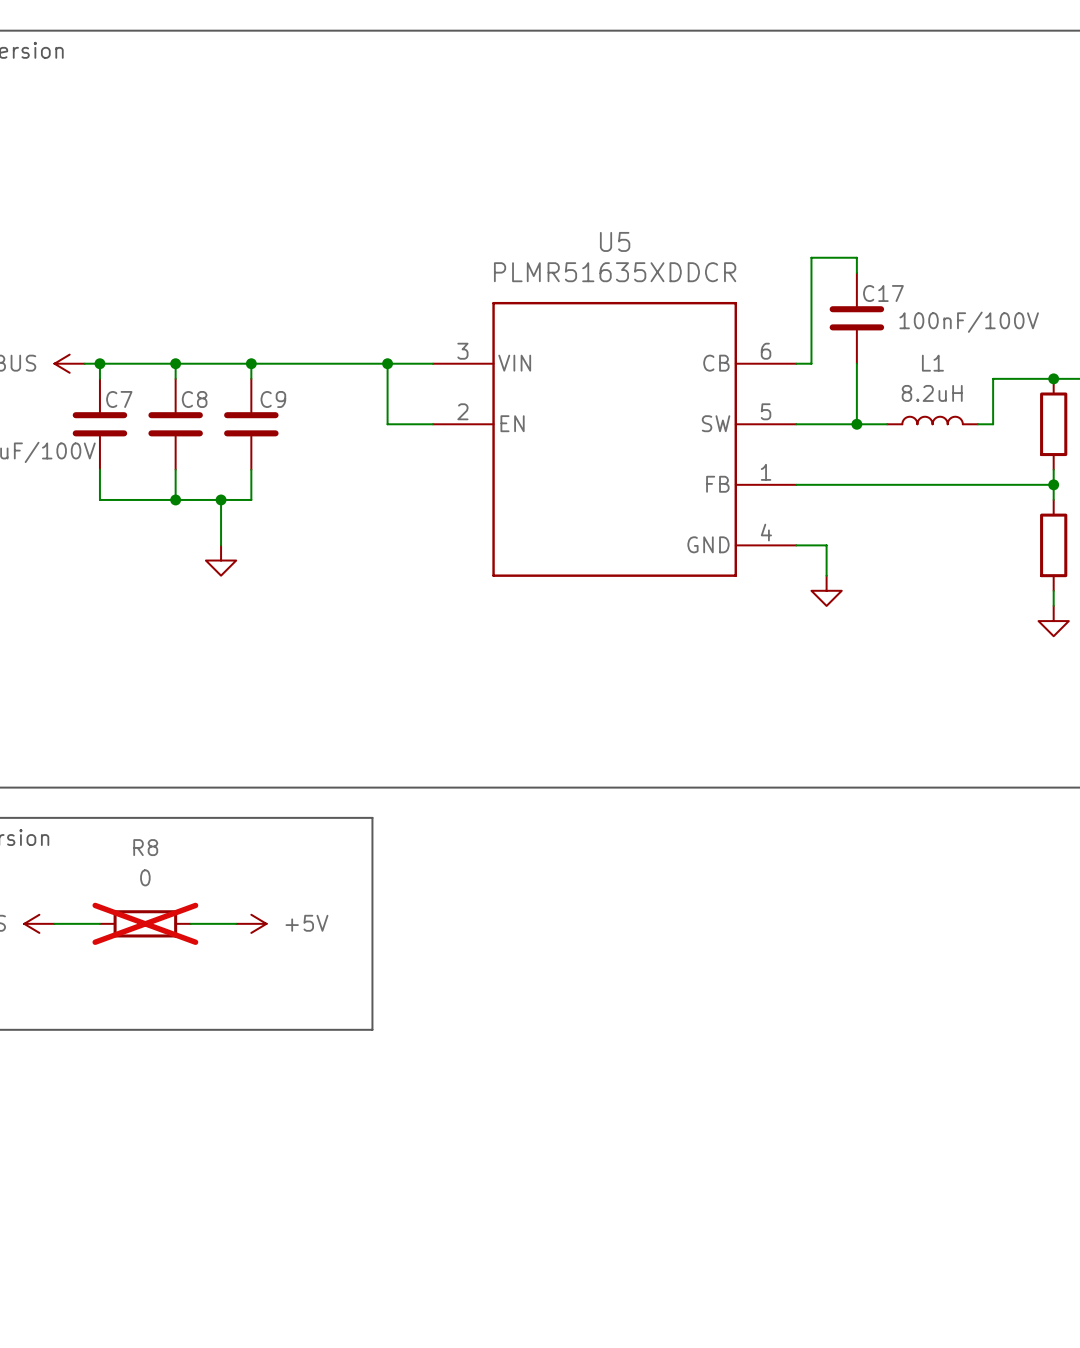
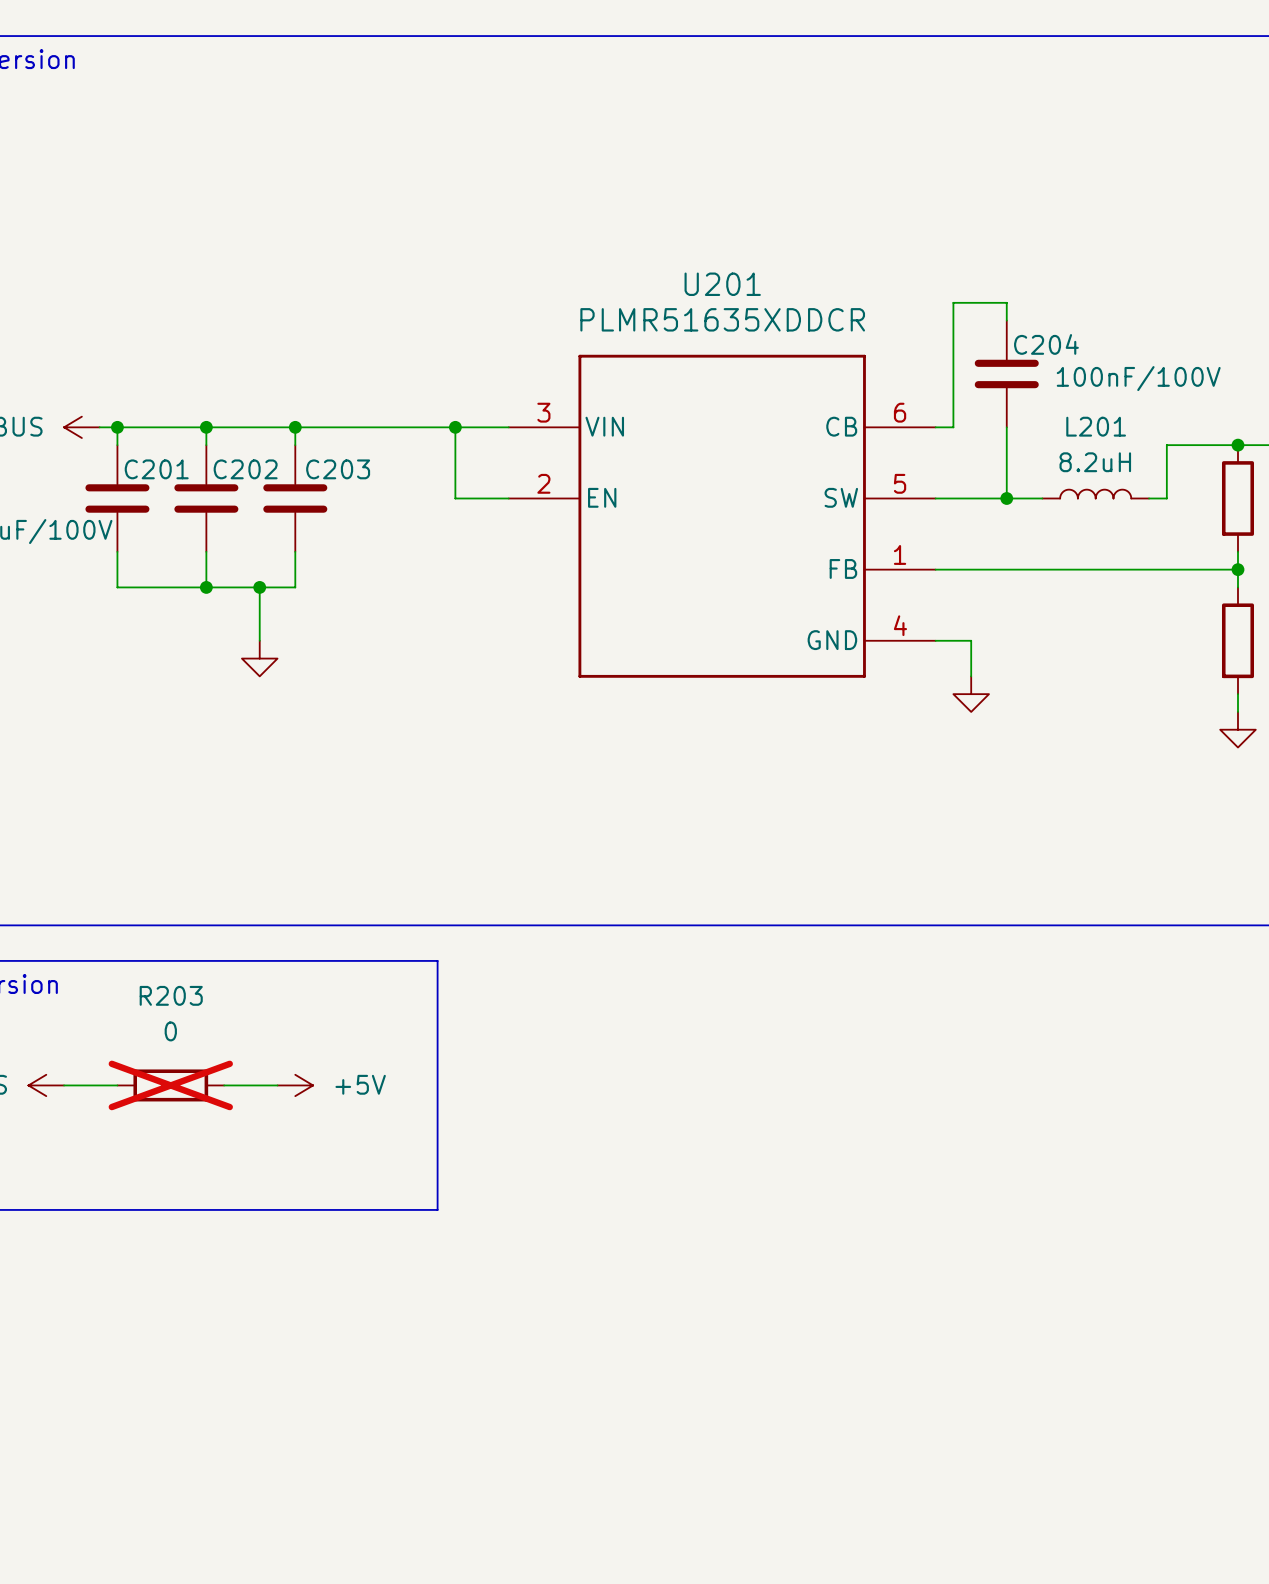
U5 name: U5 (615, 241) -> U201 (722, 284)
C17 name: C17 (883, 293) -> C204 (1046, 344)
L1 name: L1 (932, 363) -> L201 (1096, 426)
C7 name: C7 (119, 399) -> C201 (156, 469)
C8 name: C8 (194, 399) -> C202 (245, 469)
C9 name: C9 (273, 399) -> C203 (338, 469)
R8 name: R8 (145, 847) -> R203 (171, 995)

